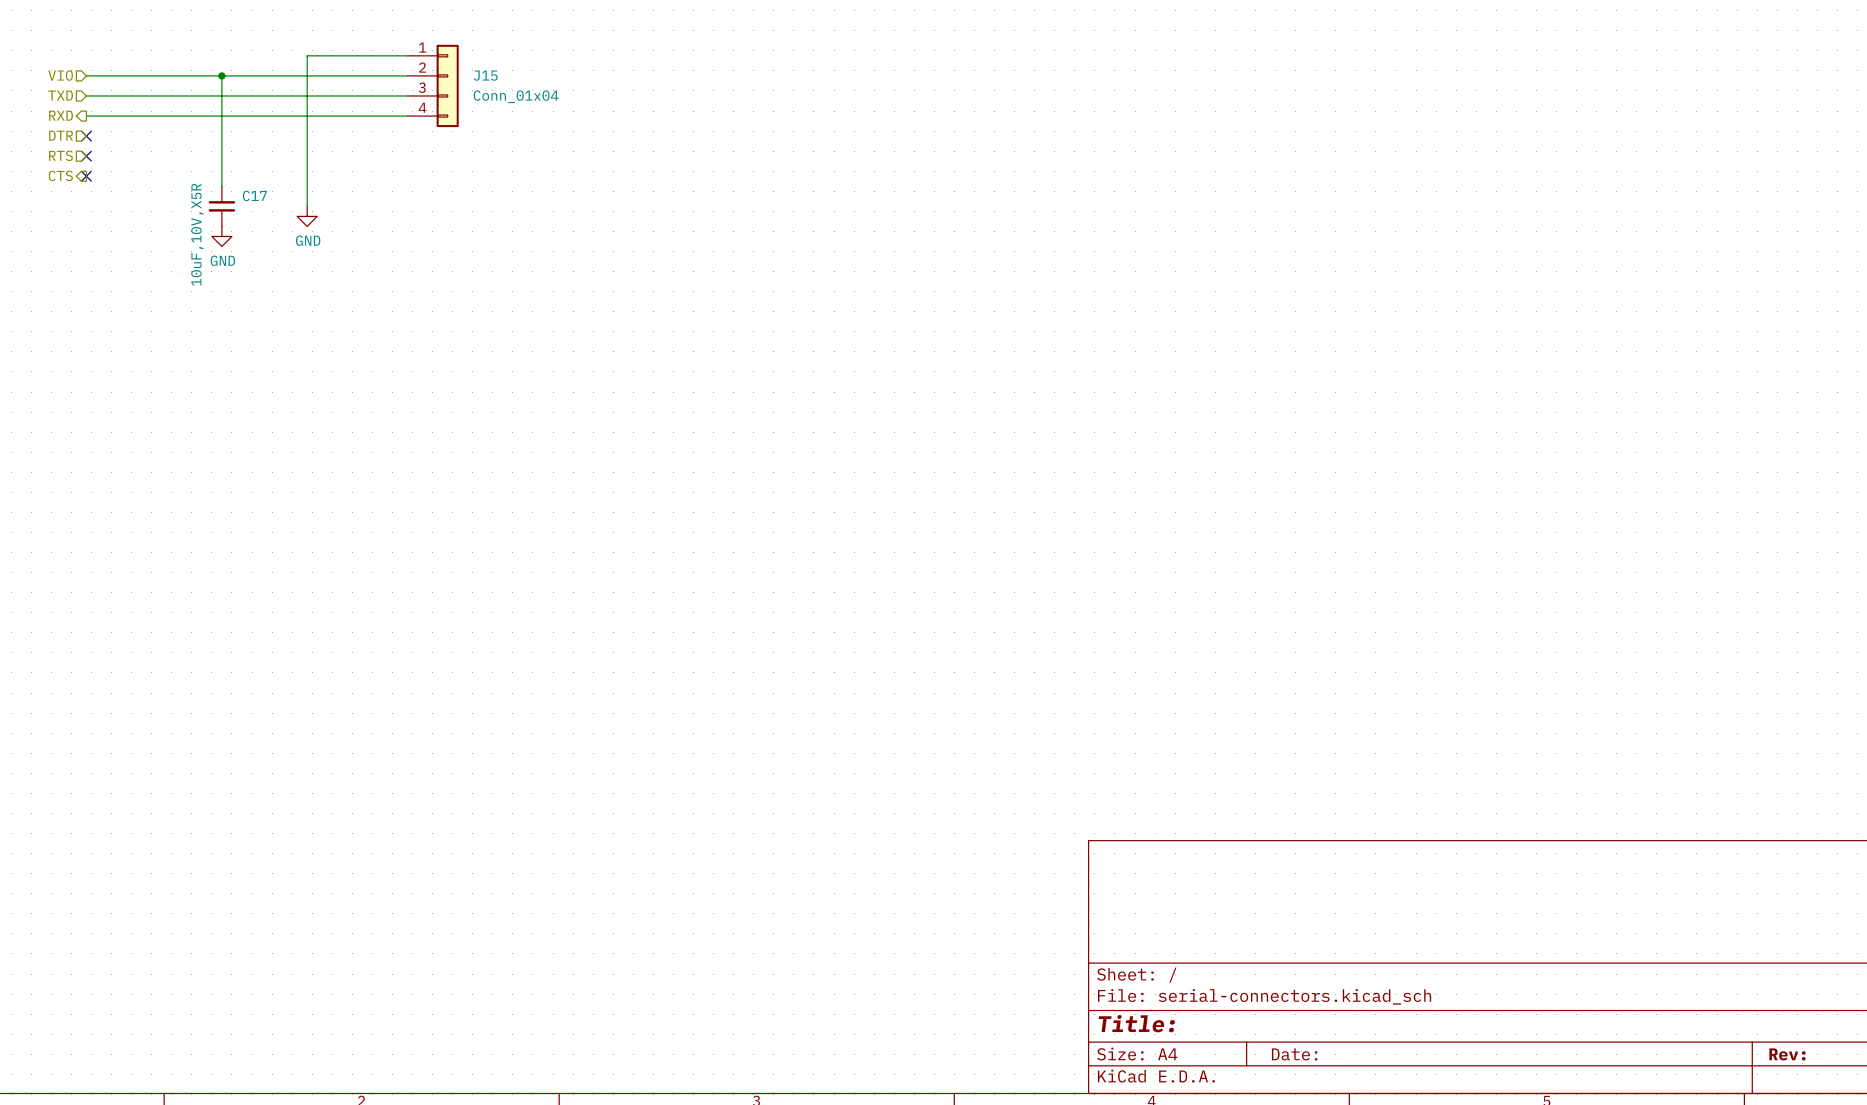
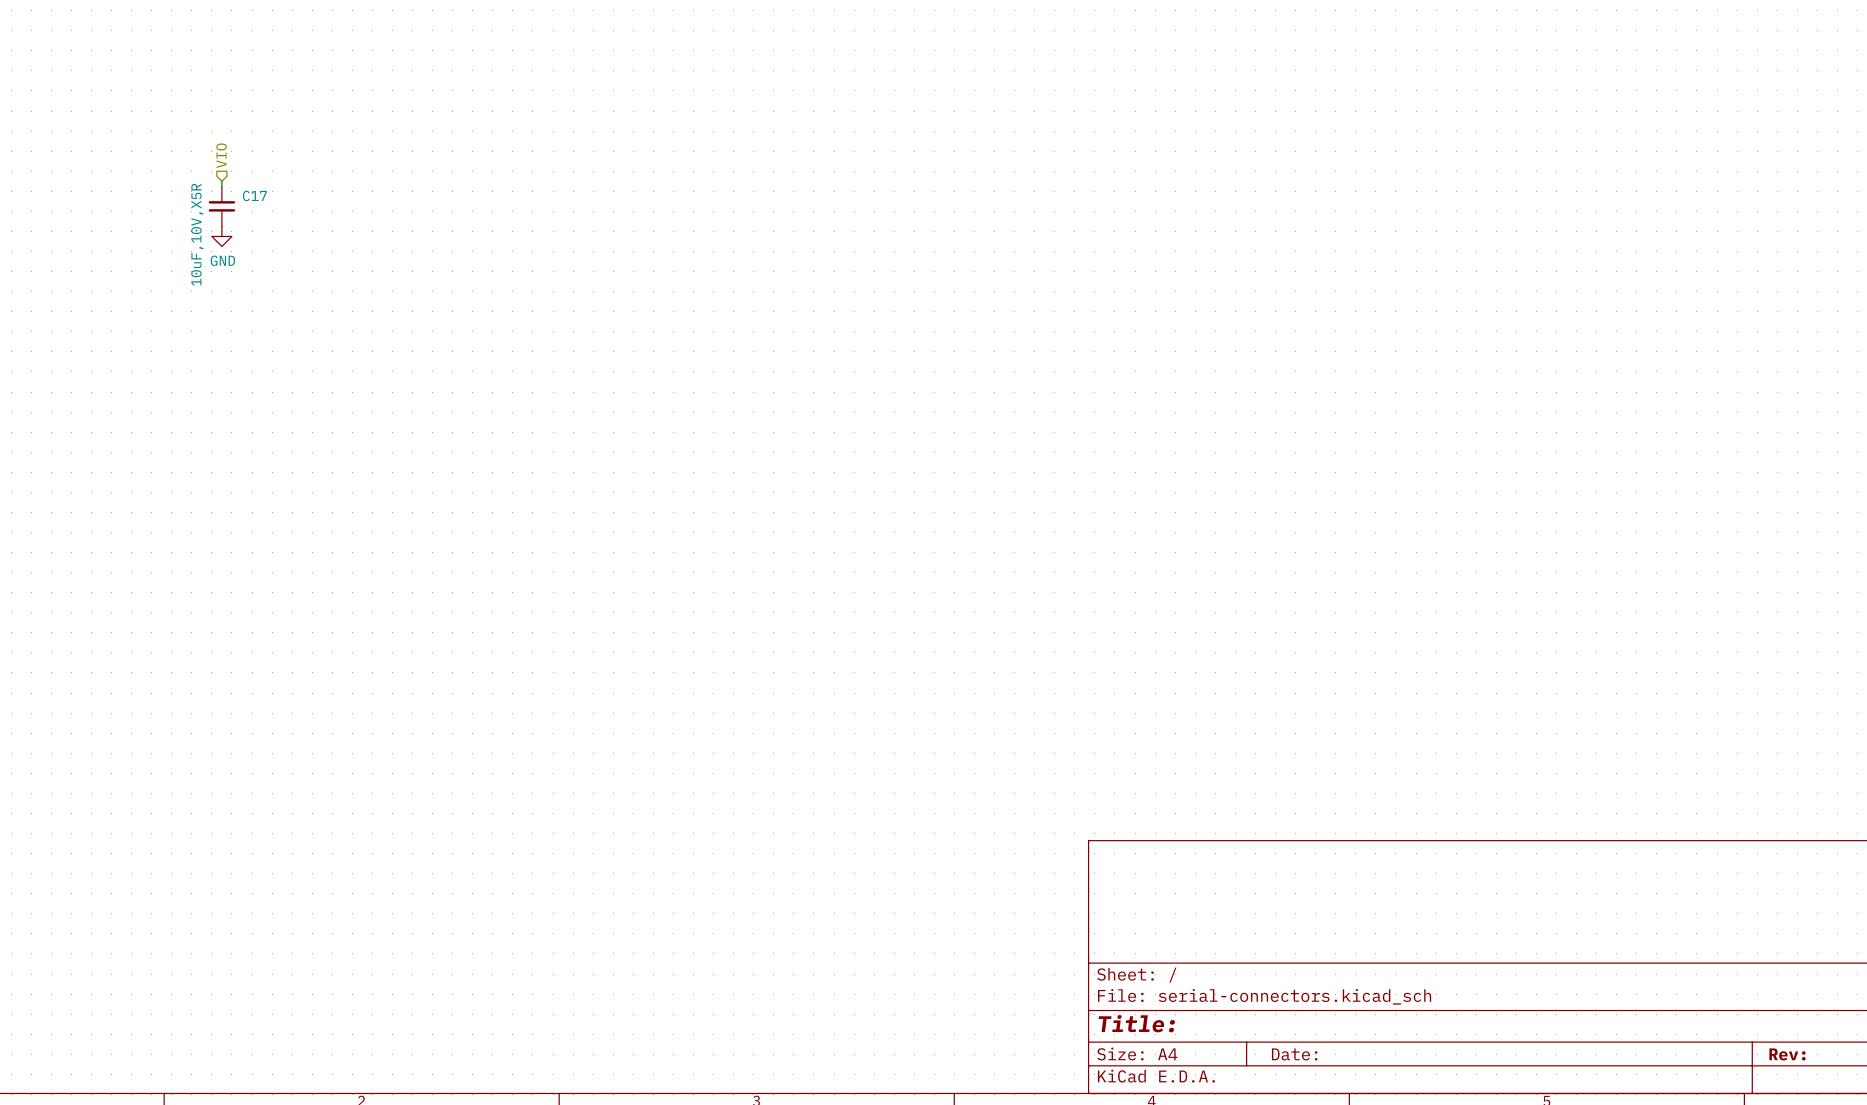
wire: (407, 55) (307, 55) (307, 206) -> none
hierarchical label rotation: 0° (60, 75) -> 90° clockwise (221, 155)
hierarchical label position: VIO (60, 75) -> VIO (221, 155)
wire: (86, 75) (407, 75) -> none
wire: (221, 75) (221, 181) -> none
junction: (221, 75) -> none
J15: Conn_01x04 (433, 85) -> none
hierarchical label: TXD (60, 95) -> none
wire: (86, 95) (407, 95) -> none
hierarchical label: RXD (60, 115) -> none
wire: (86, 116) (407, 116) -> none
hierarchical label: DTR (61, 135) -> none
no-connect mark: (86, 136) -> none
hierarchical label: RTS (60, 155) -> none
no-connect mark: (86, 156) -> none
hierarchical label: CTS (60, 175) -> none
no-connect mark: (86, 176) -> none
power symbol: GND (307, 216) -> none

